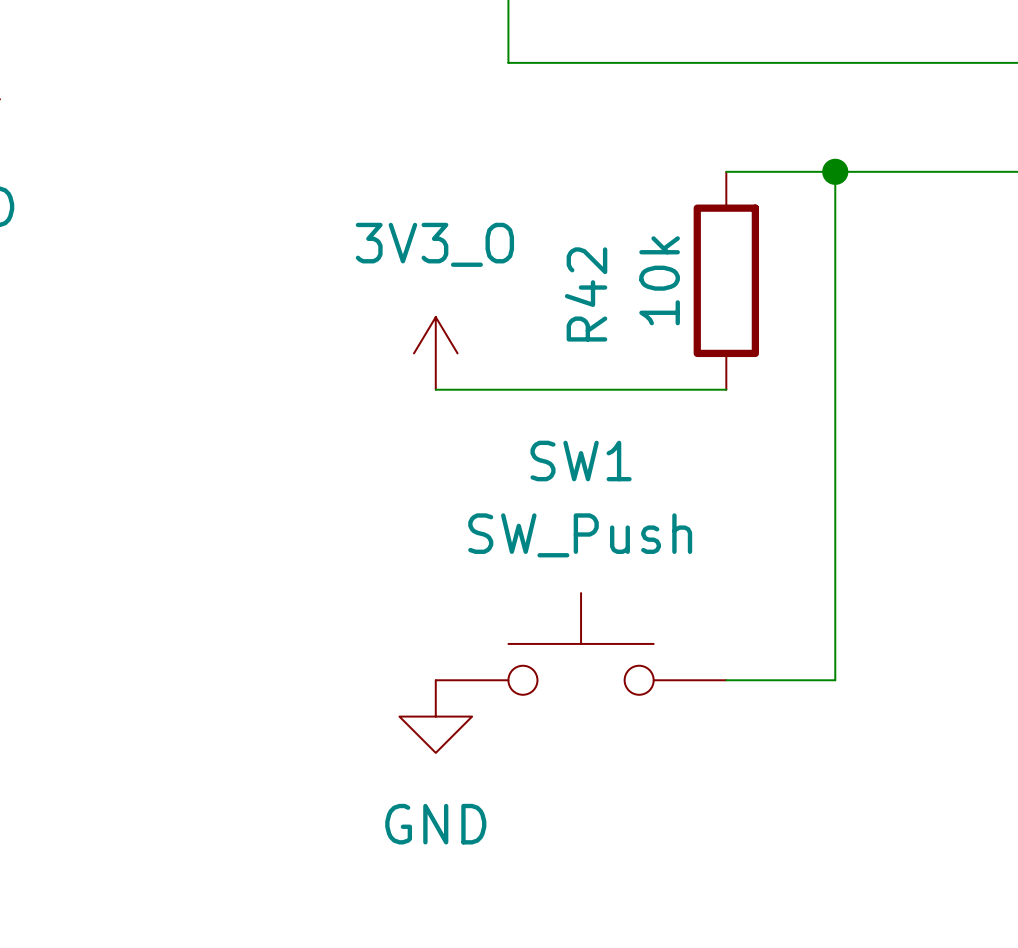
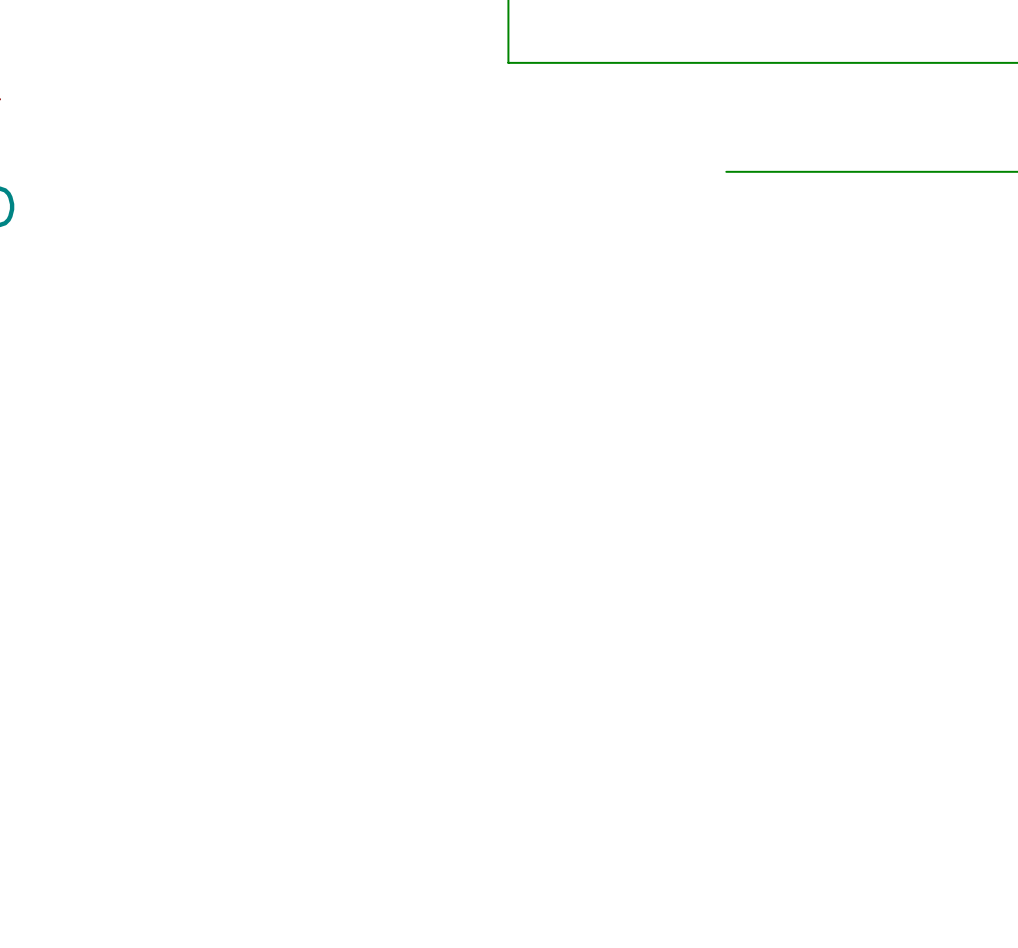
wire: (835, 171) (835, 680) (726, 680) -> none
junction: (835, 171) -> none
R42: 10k (726, 280) -> none
power symbol: 3V3_O (435, 353) -> none
wire: (435, 389) (726, 389) -> none
SW1: SW_Push (581, 643) -> none
power symbol: GND (435, 716) -> none

